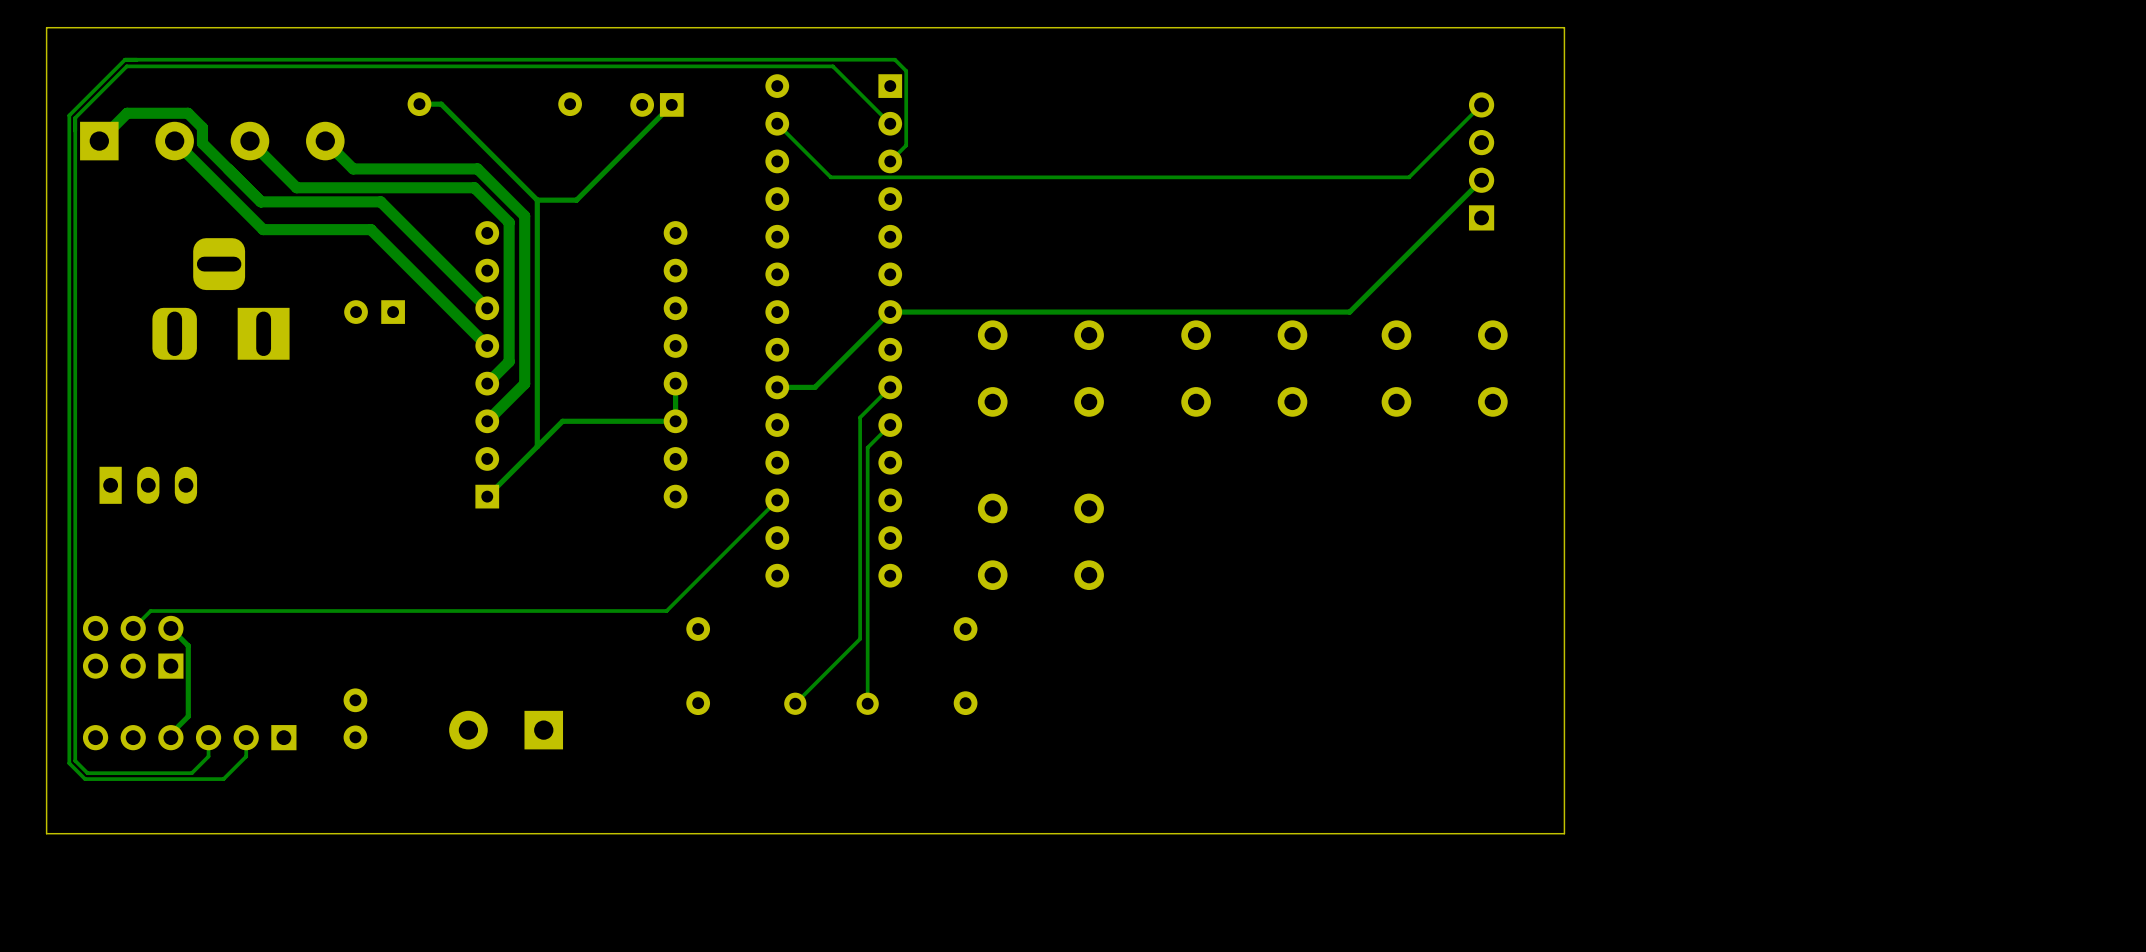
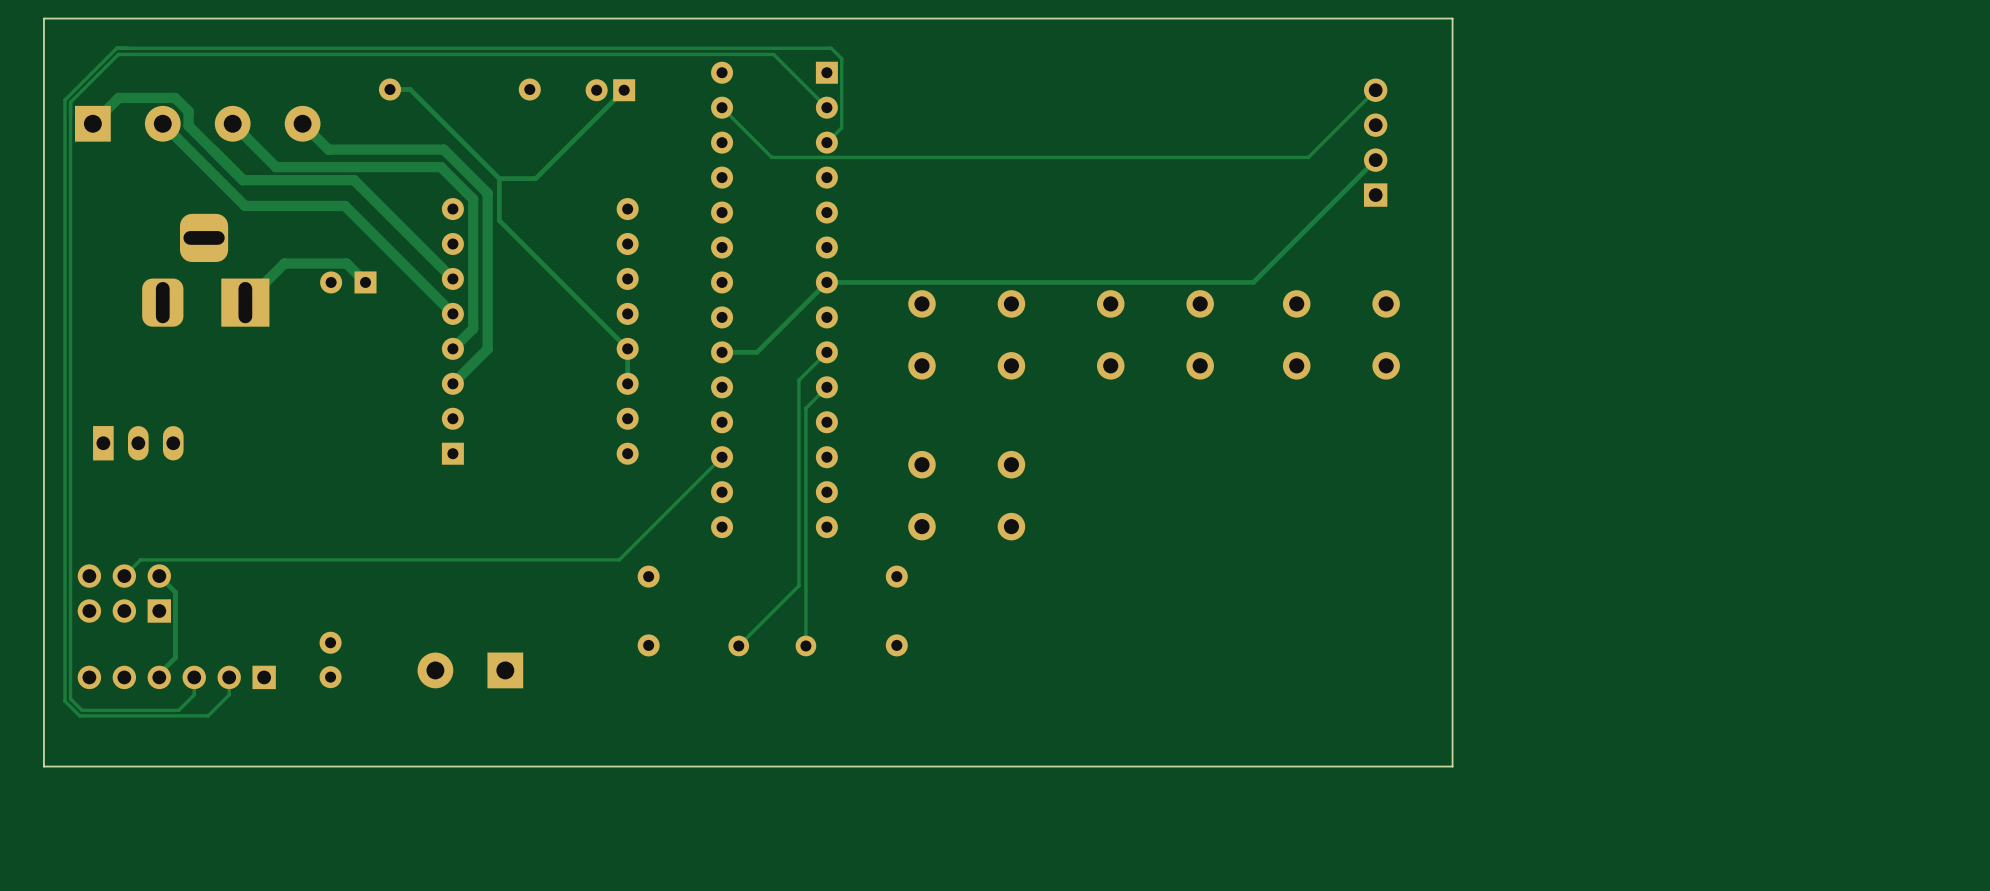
track: (537, 245) (537, 446) -> (499, 220) (627, 348)
track: none -> (365, 282) (346, 263) (284, 263) (245, 302)
track: (675, 421) (562, 421) (487, 496) -> none

